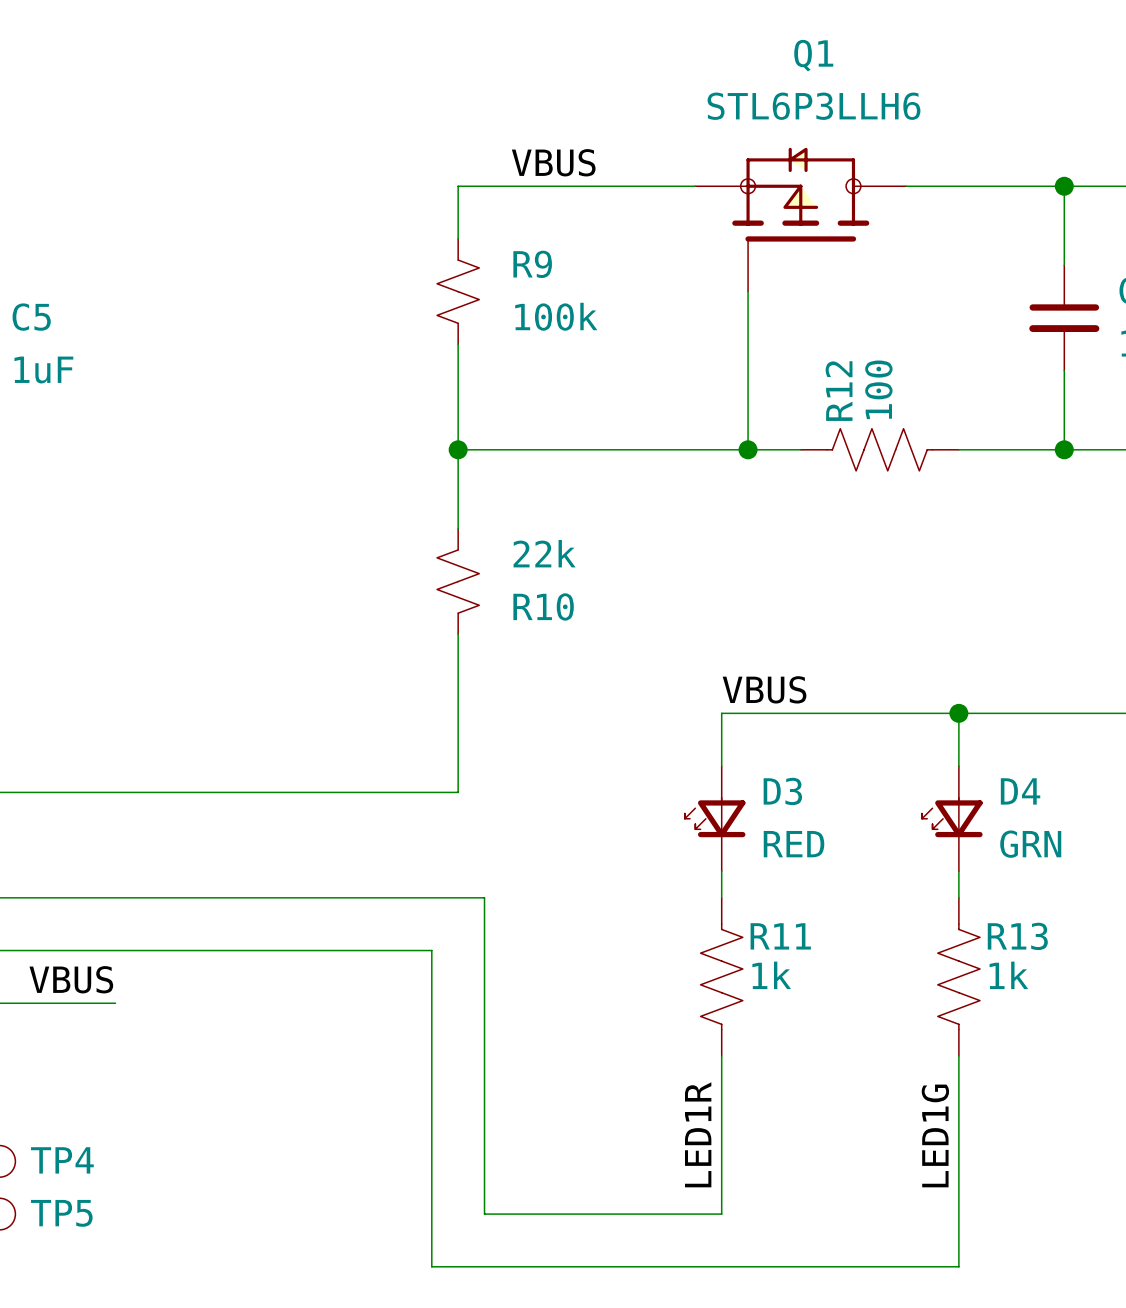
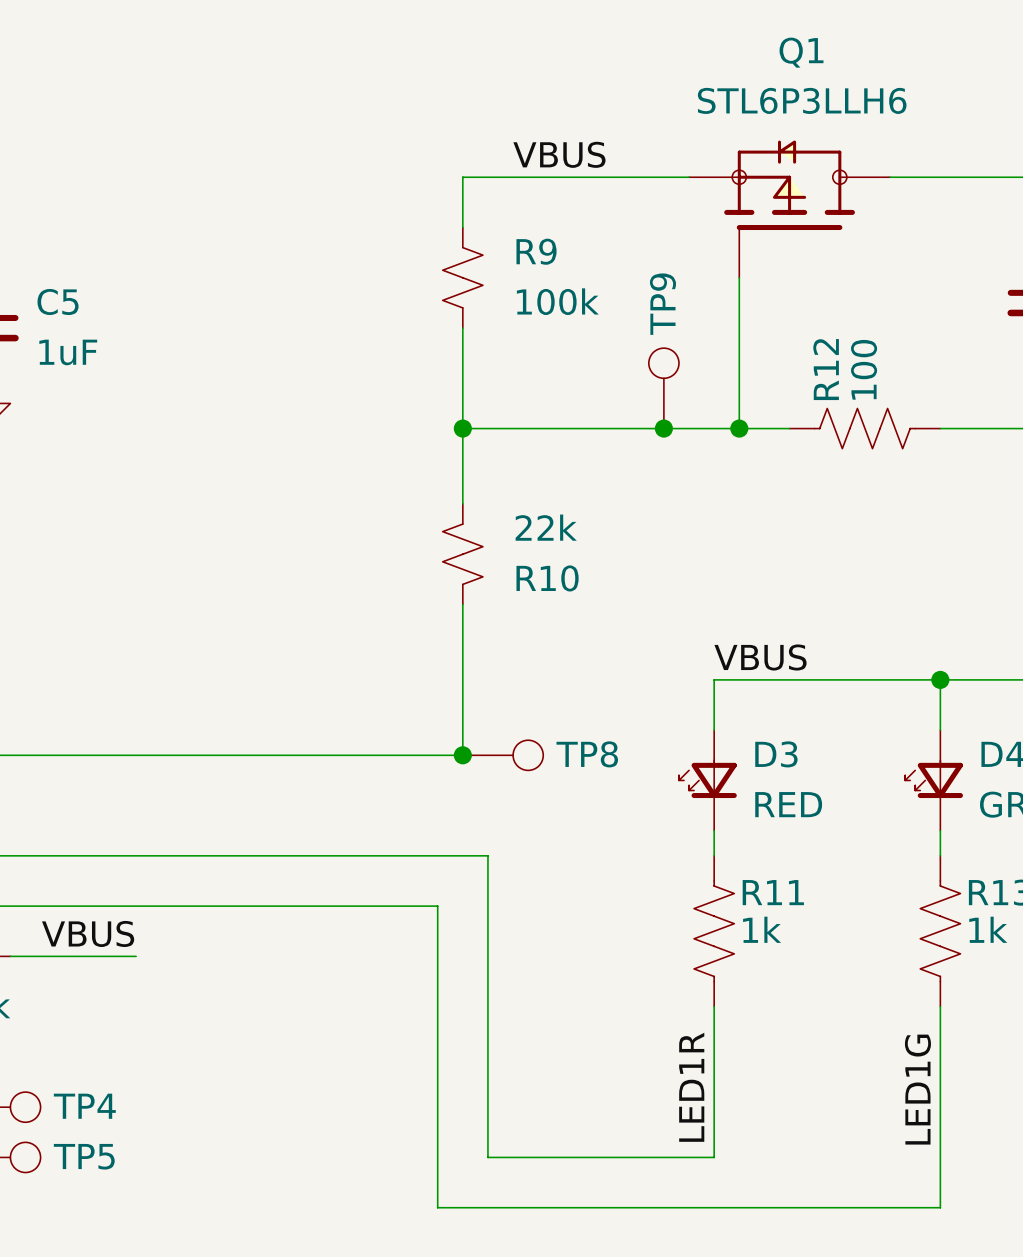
TP9: none -> (663, 388)
junction: none -> (663, 428)
junction: none -> (462, 755)
TP8: none -> (503, 755)

